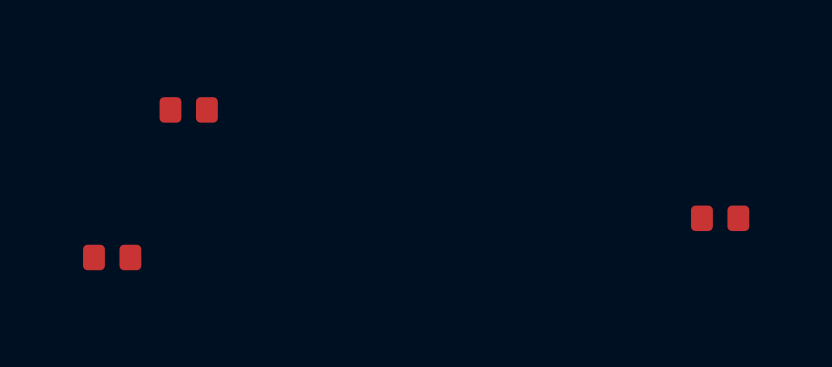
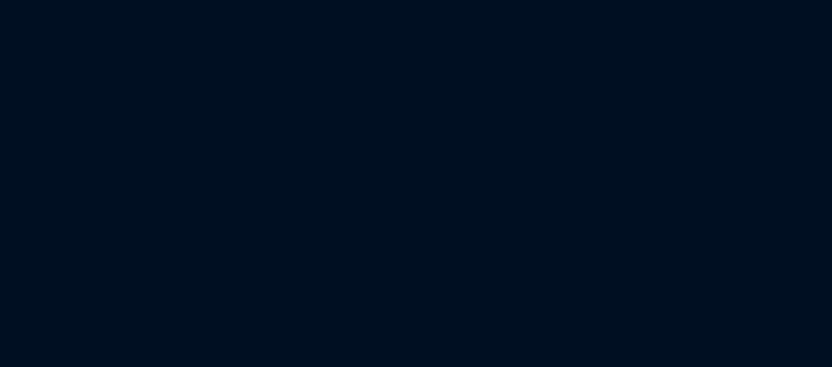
part: (188, 109) -> none
part: (720, 218) -> none
part: (112, 257) -> none

